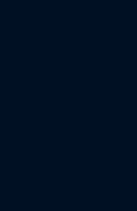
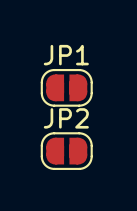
JP1: none -> (66, 87)
JP2: none -> (66, 151)

